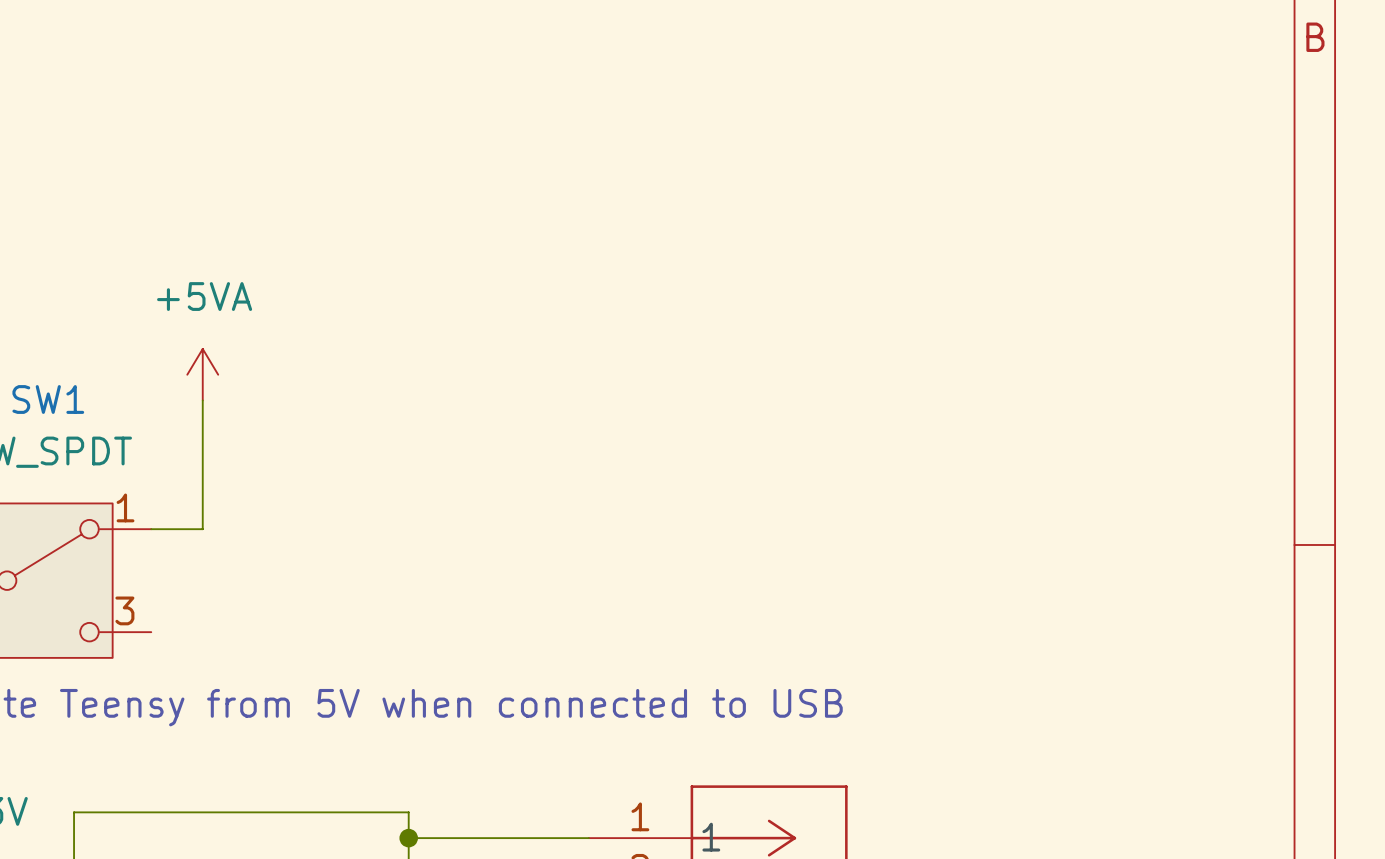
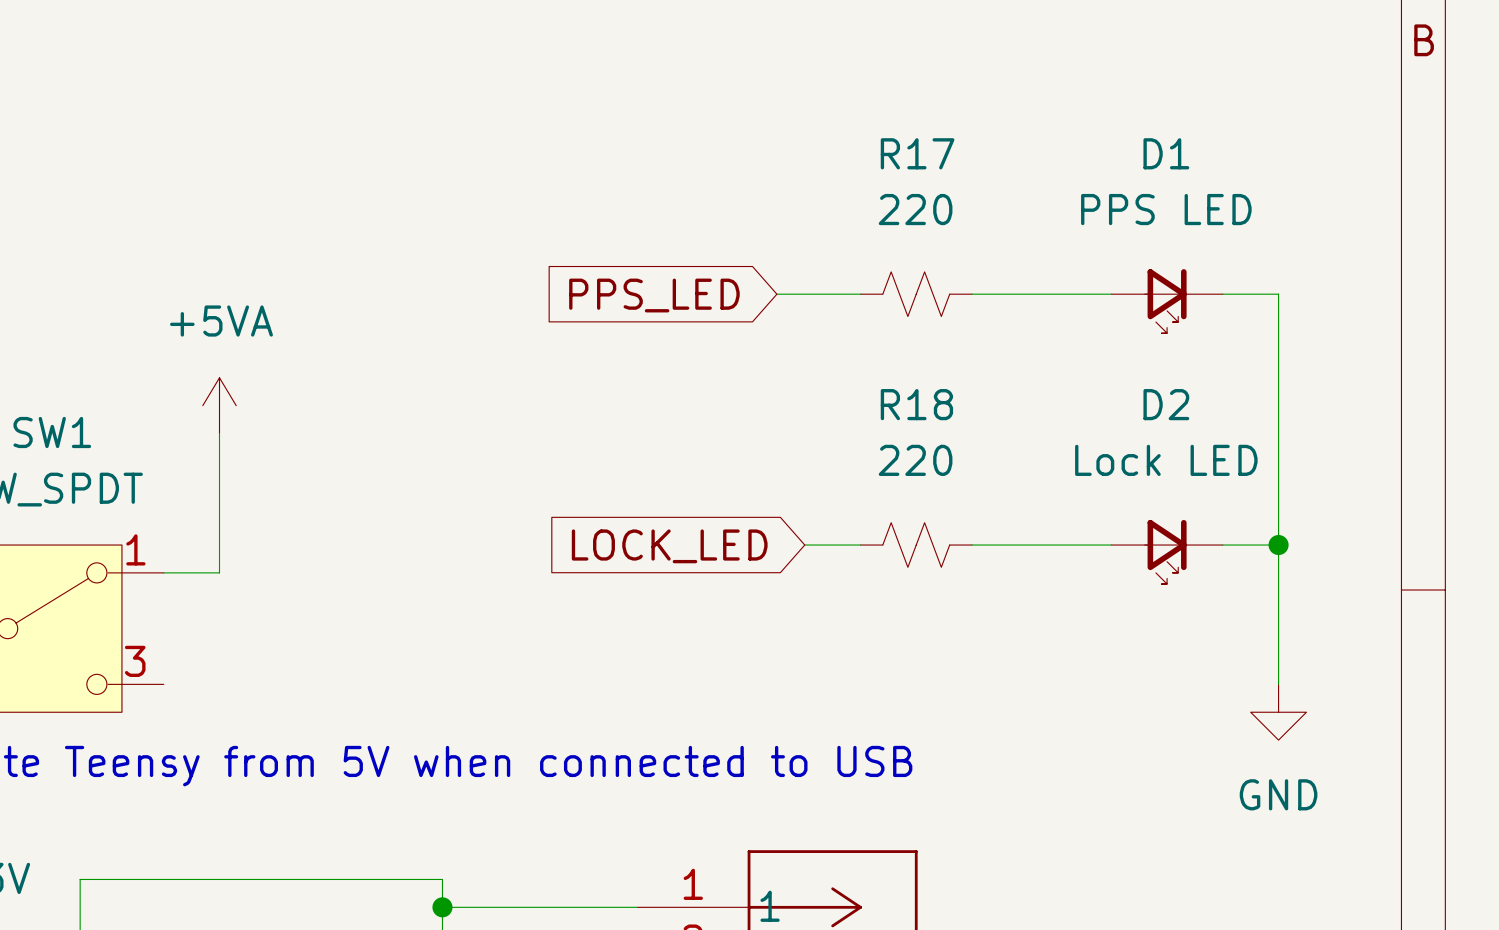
wire: none -> (776, 294) (860, 294)
R17: none -> 220 (916, 294)
wire: none -> (971, 294) (1111, 294)
wire: none -> (1222, 294) (1278, 294) (1278, 684)
global label: none -> PPS_LED (654, 295)
D1: none -> PPS LED (1167, 301)
wire: none -> (804, 545) (860, 545)
R18: none -> 220 (916, 545)
wire: none -> (971, 545) (1111, 545)
wire: none -> (1222, 545) (1278, 545)
junction: none -> (1278, 545)
global label: none -> LOCK_LED (669, 546)
D2: none -> Lock LED (1167, 551)
power symbol: none -> GND (1278, 712)

